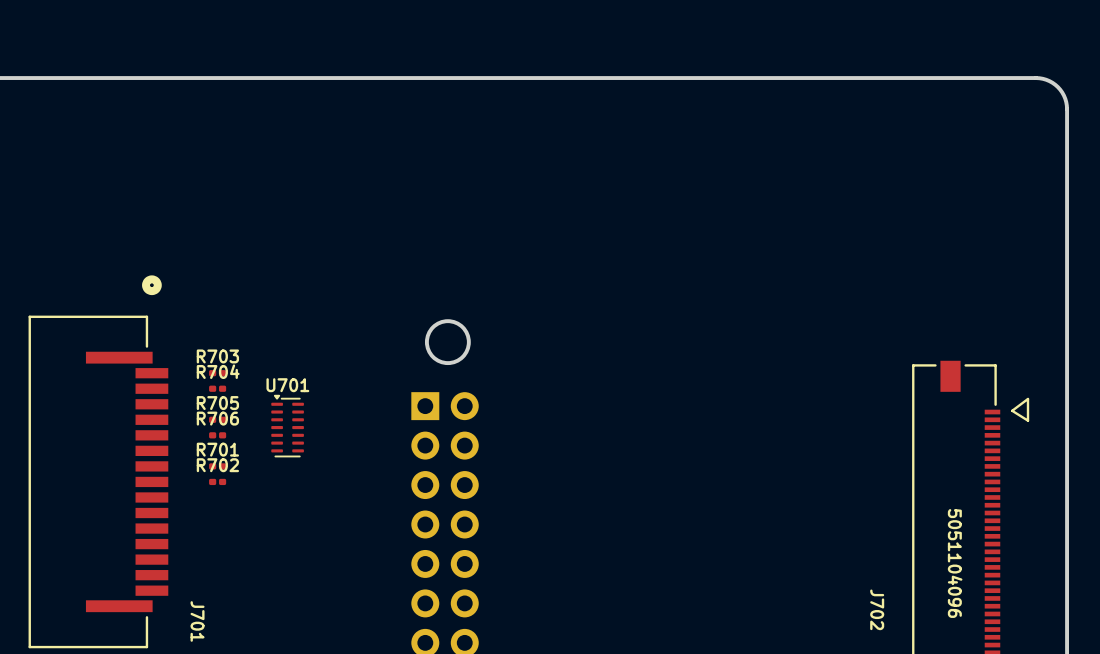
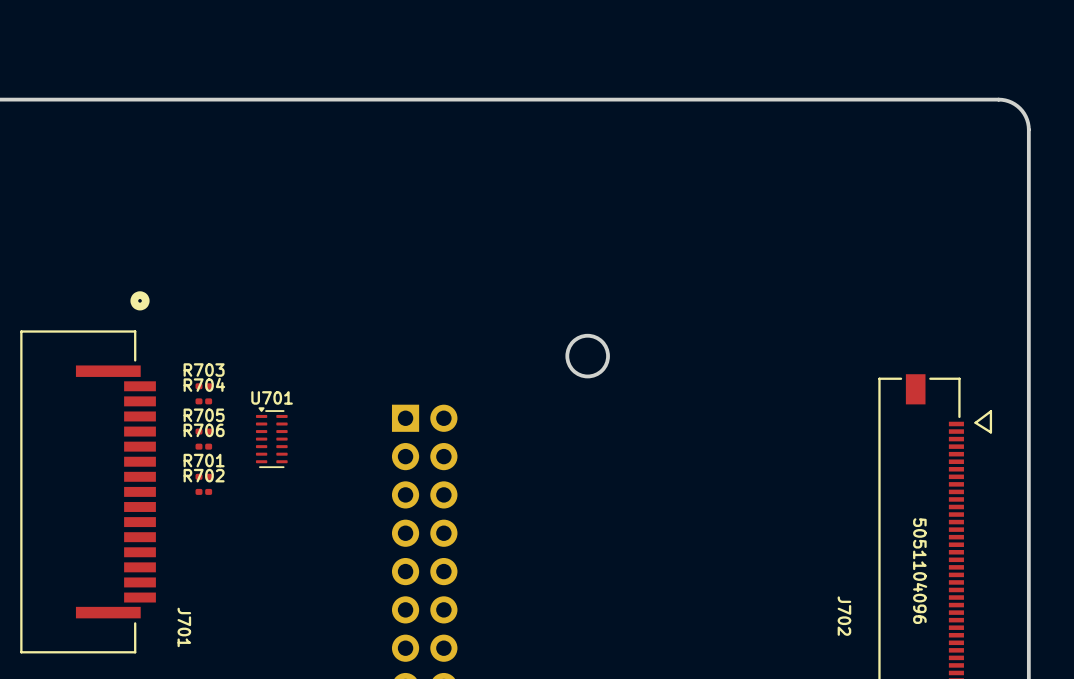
round board edge position: (447, 342) -> (587, 356)

